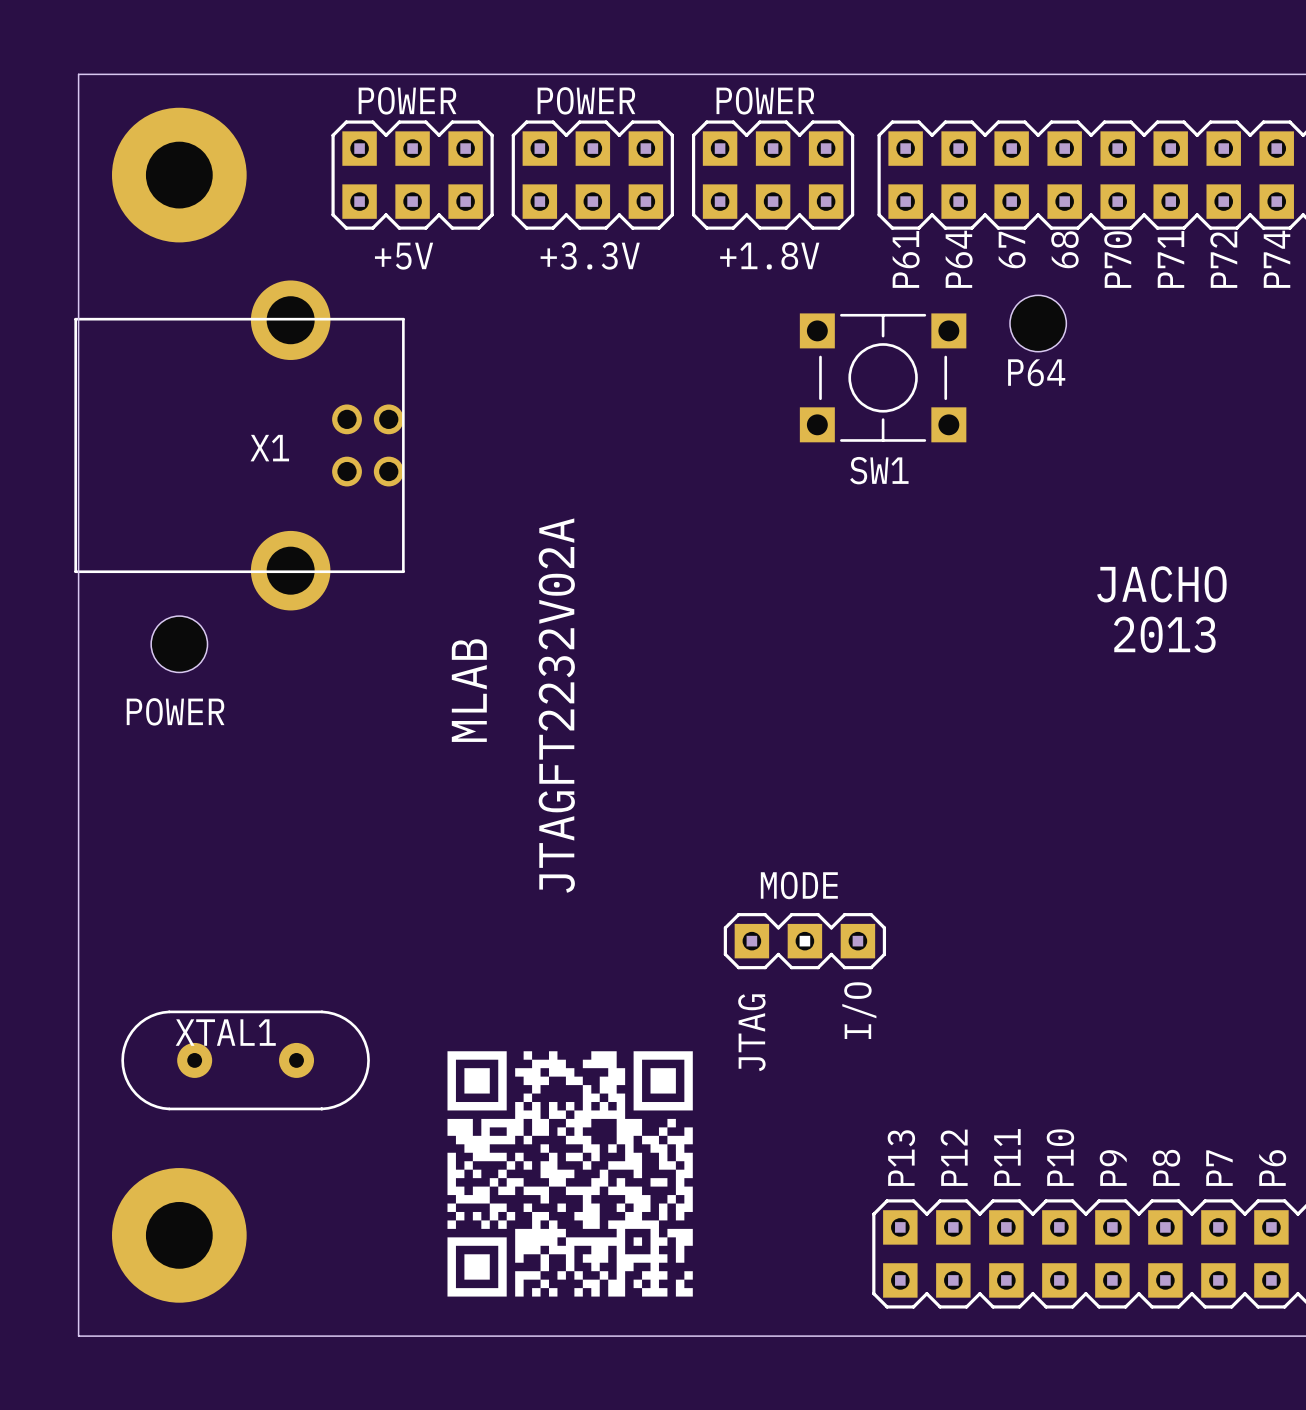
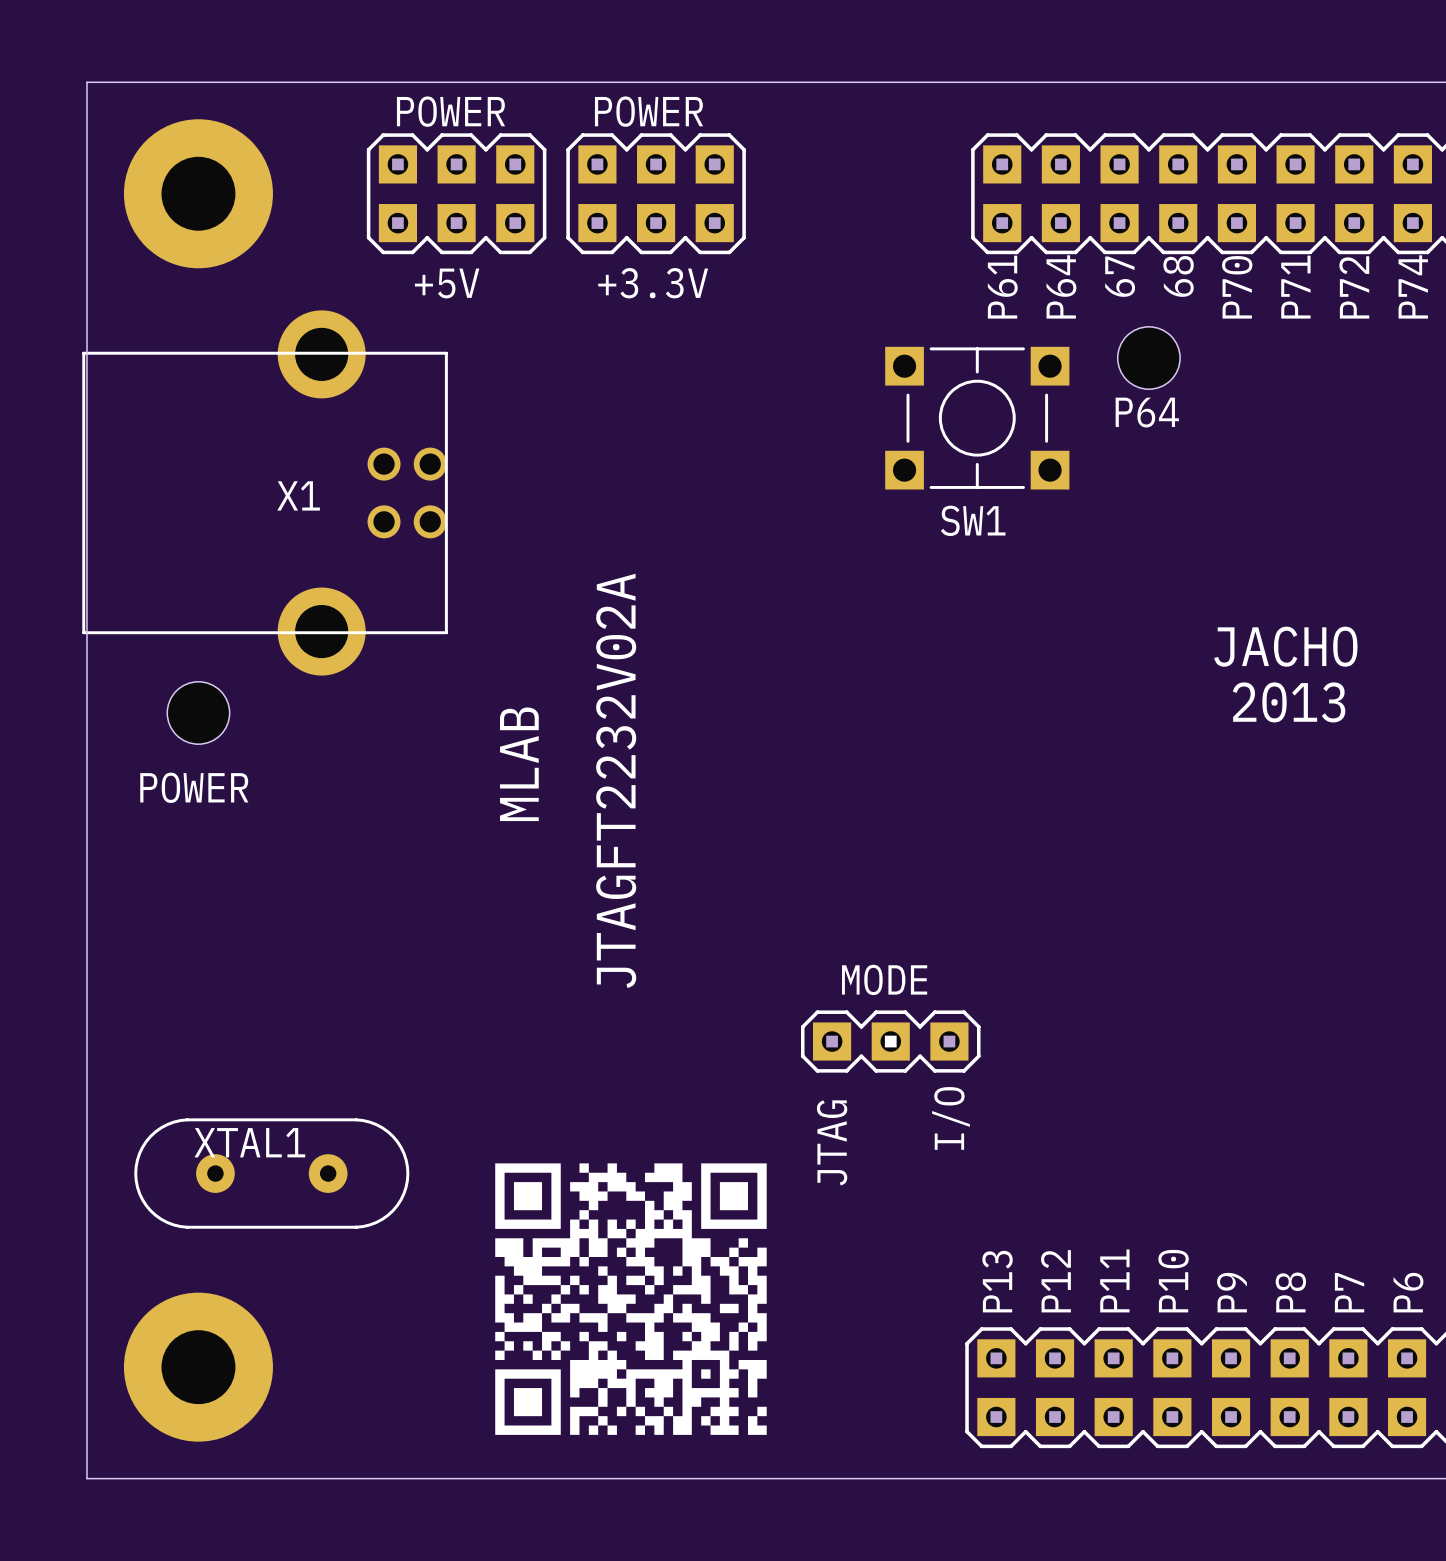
text: POWER (765, 100) -> none
part: (773, 175) -> none
text: +1.8V (769, 255) -> none

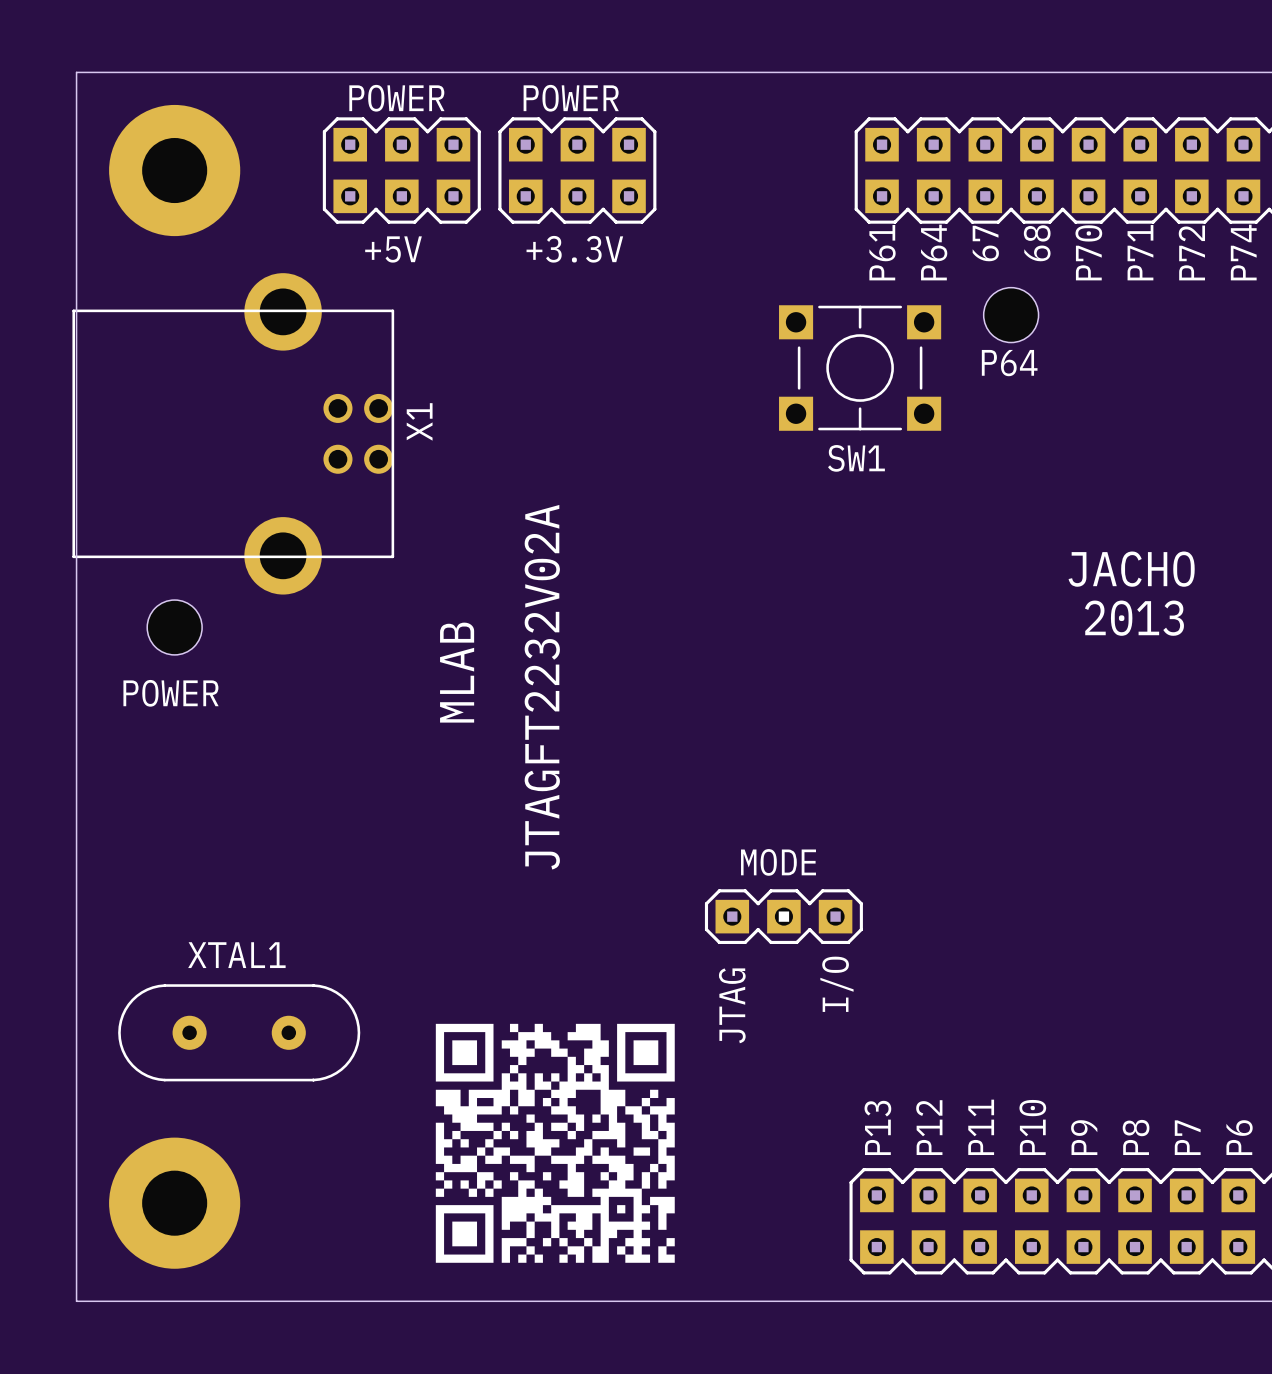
X1 name rotation: 0° (298, 495) -> 90° counterclockwise (419, 421)
X1 name position: X1 (298, 495) -> X1 (419, 421)
XTAL1 name position: XTAL1 (249, 1142) -> XTAL1 (236, 955)

